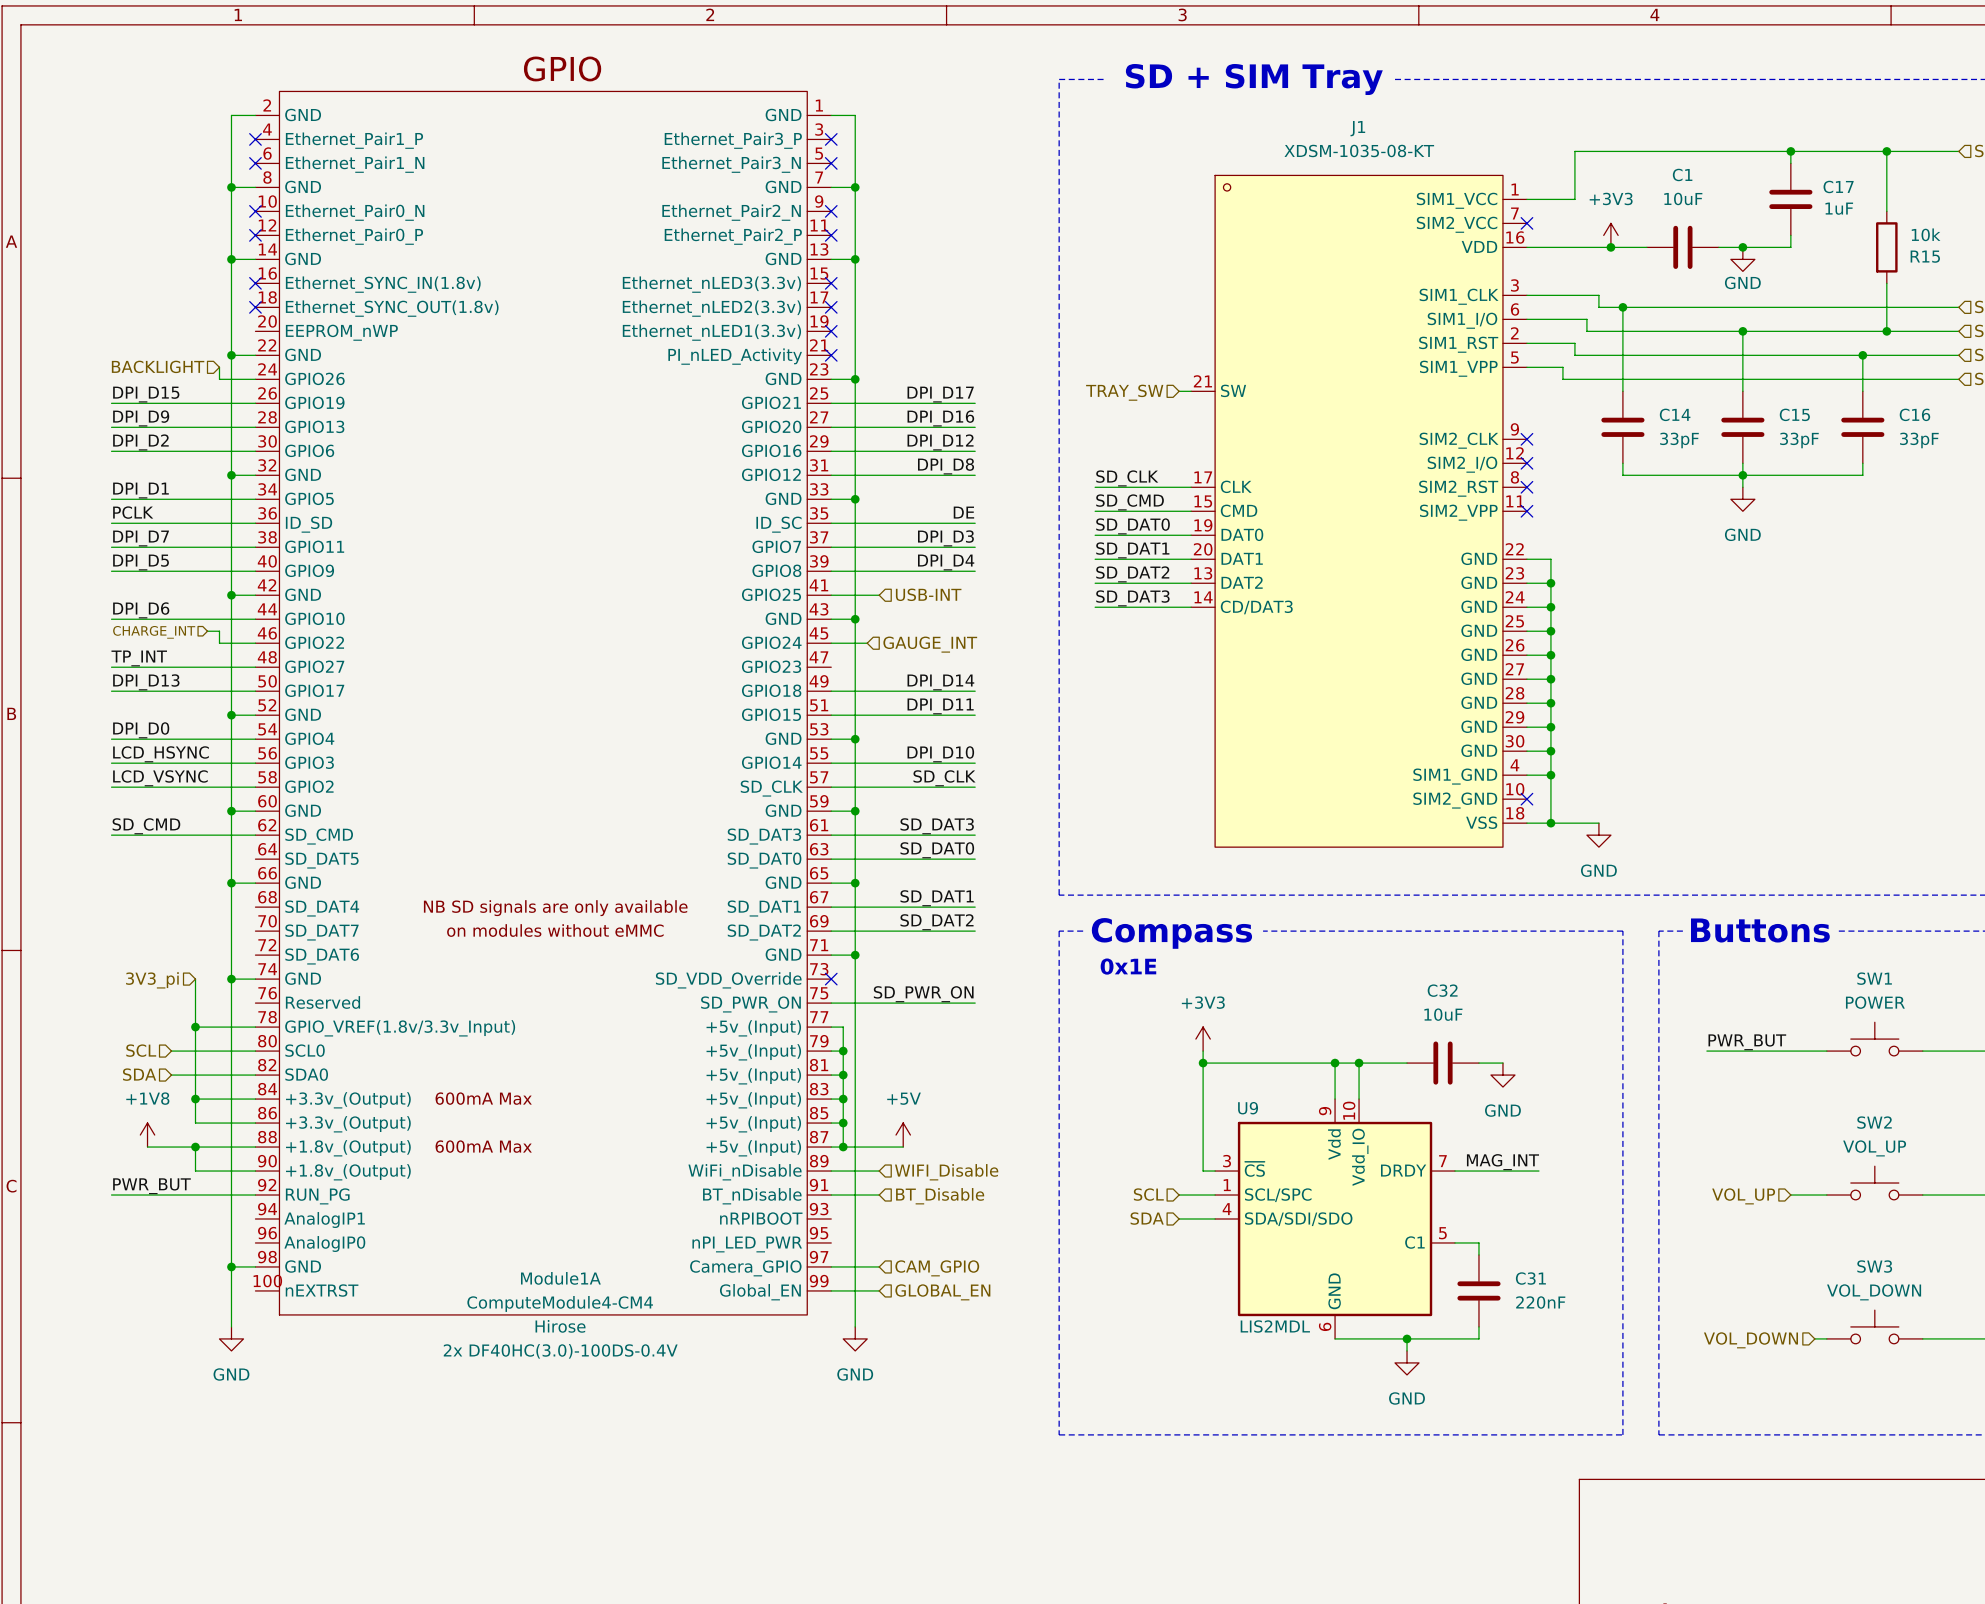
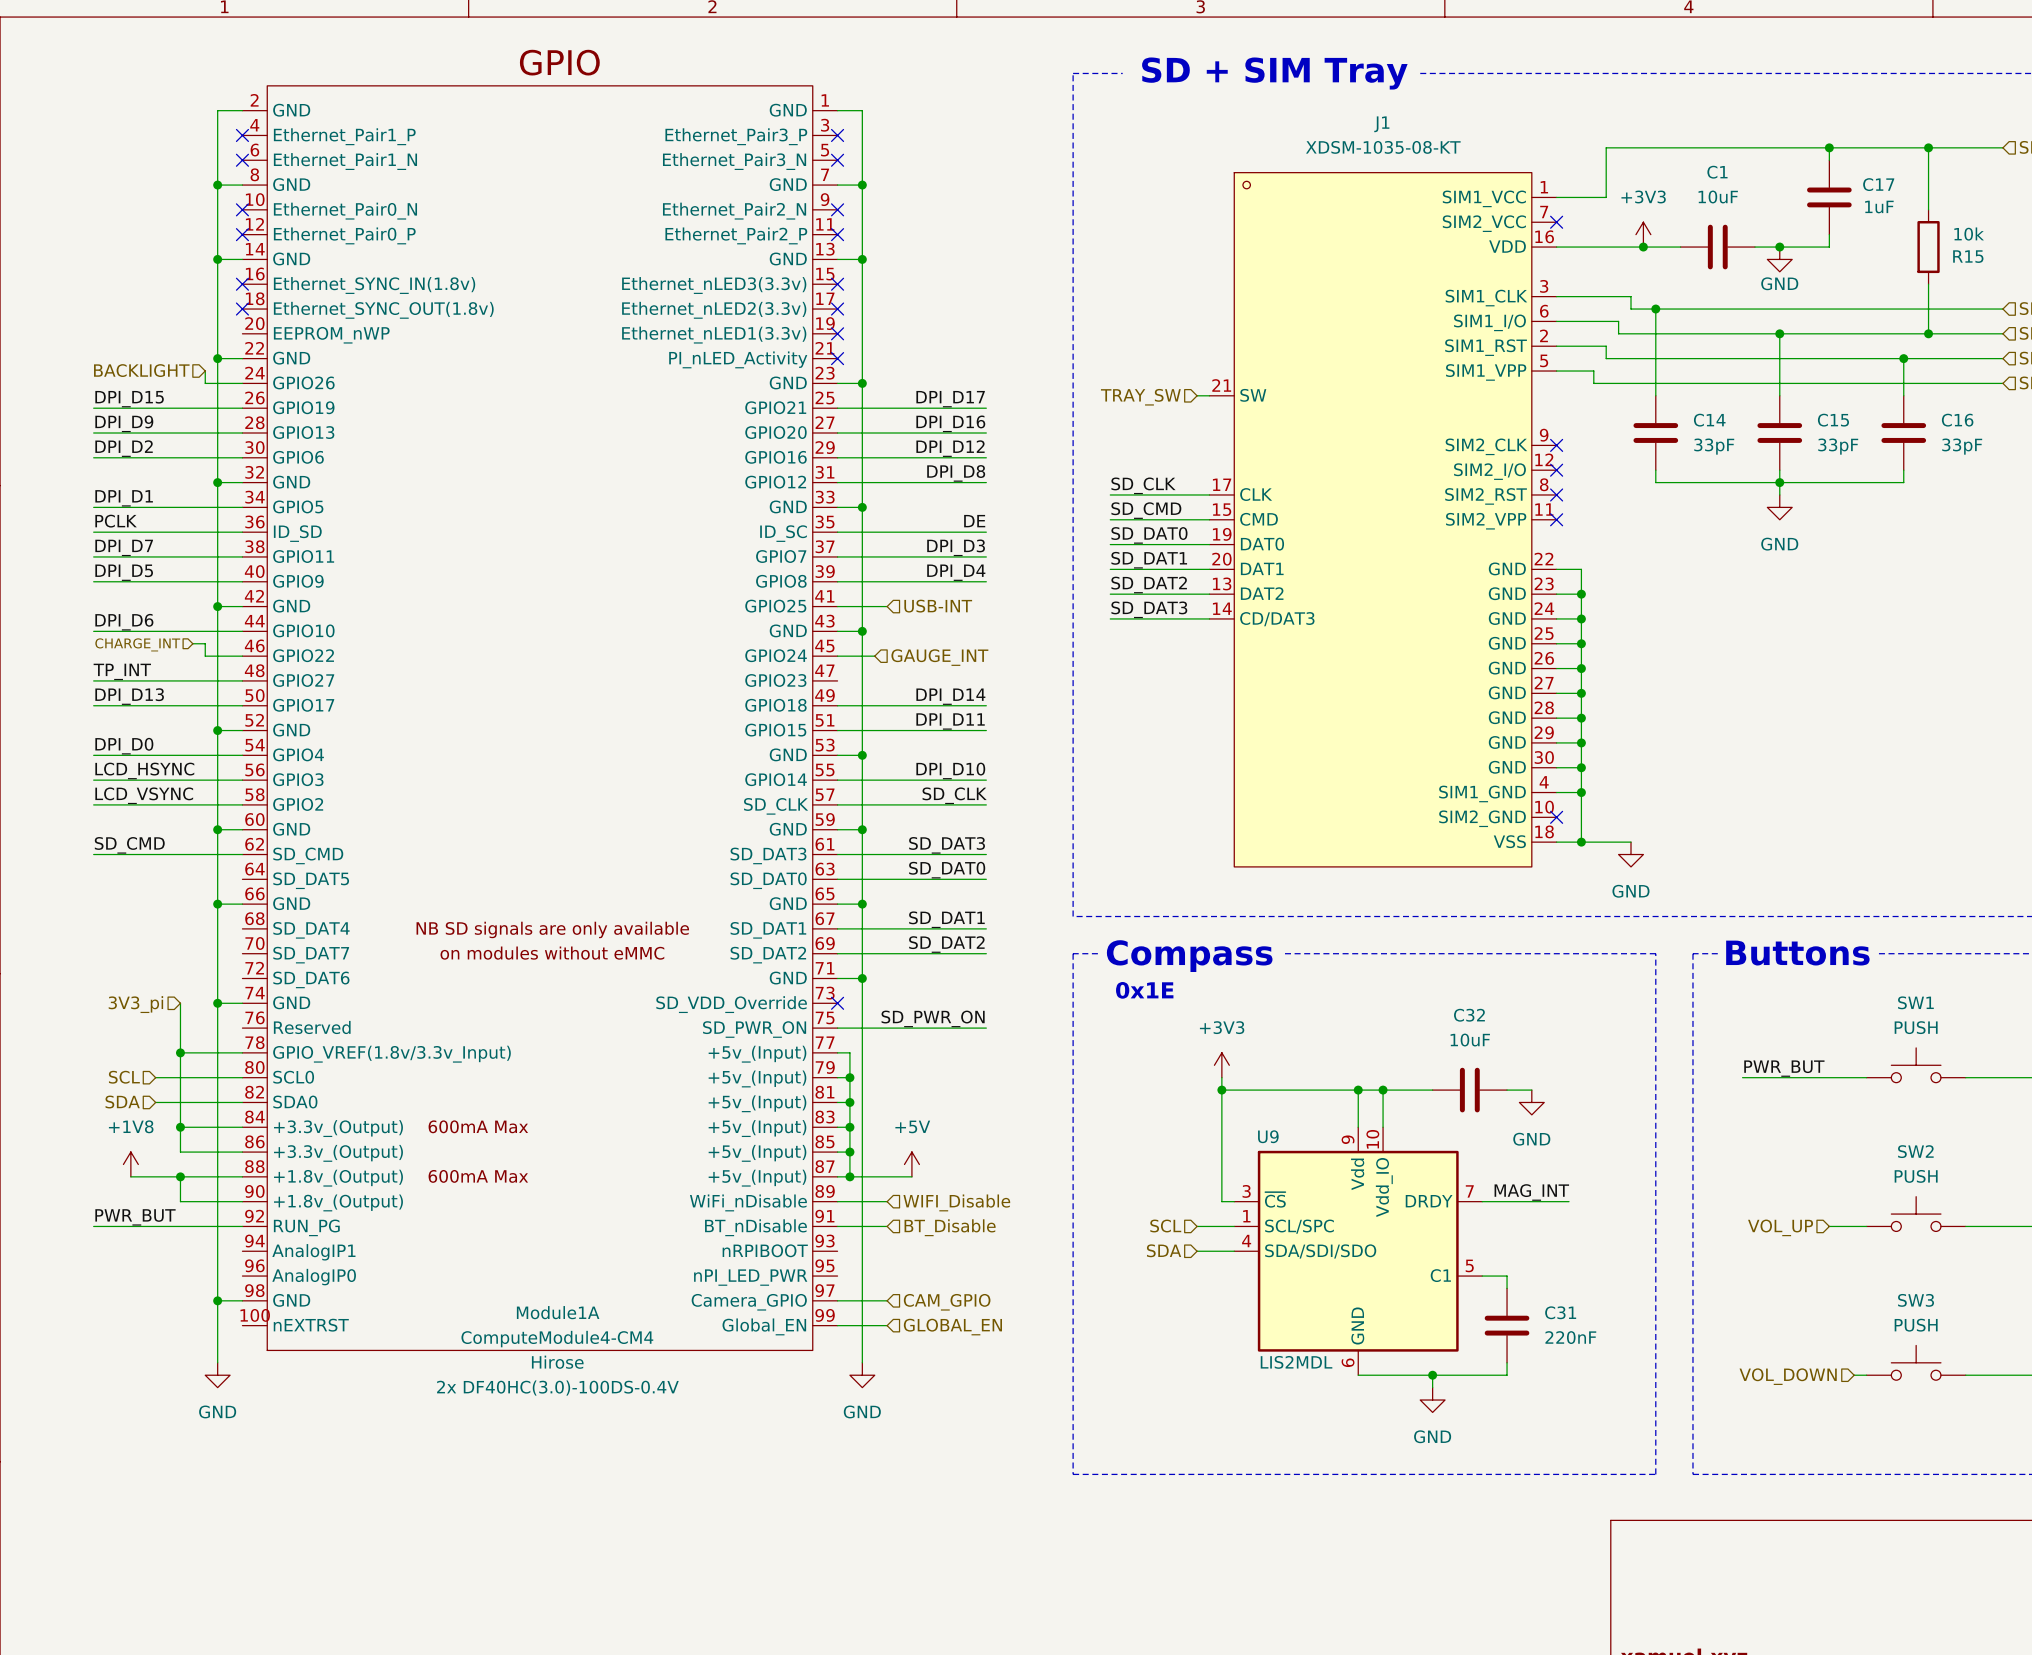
SW1 value: POWER (1875, 1002) -> PUSH (1916, 1027)
SW2 value: VOL_UP (1874, 1148) -> PUSH (1916, 1176)
SW3 value: VOL_DOWN (1874, 1292) -> PUSH (1916, 1325)

